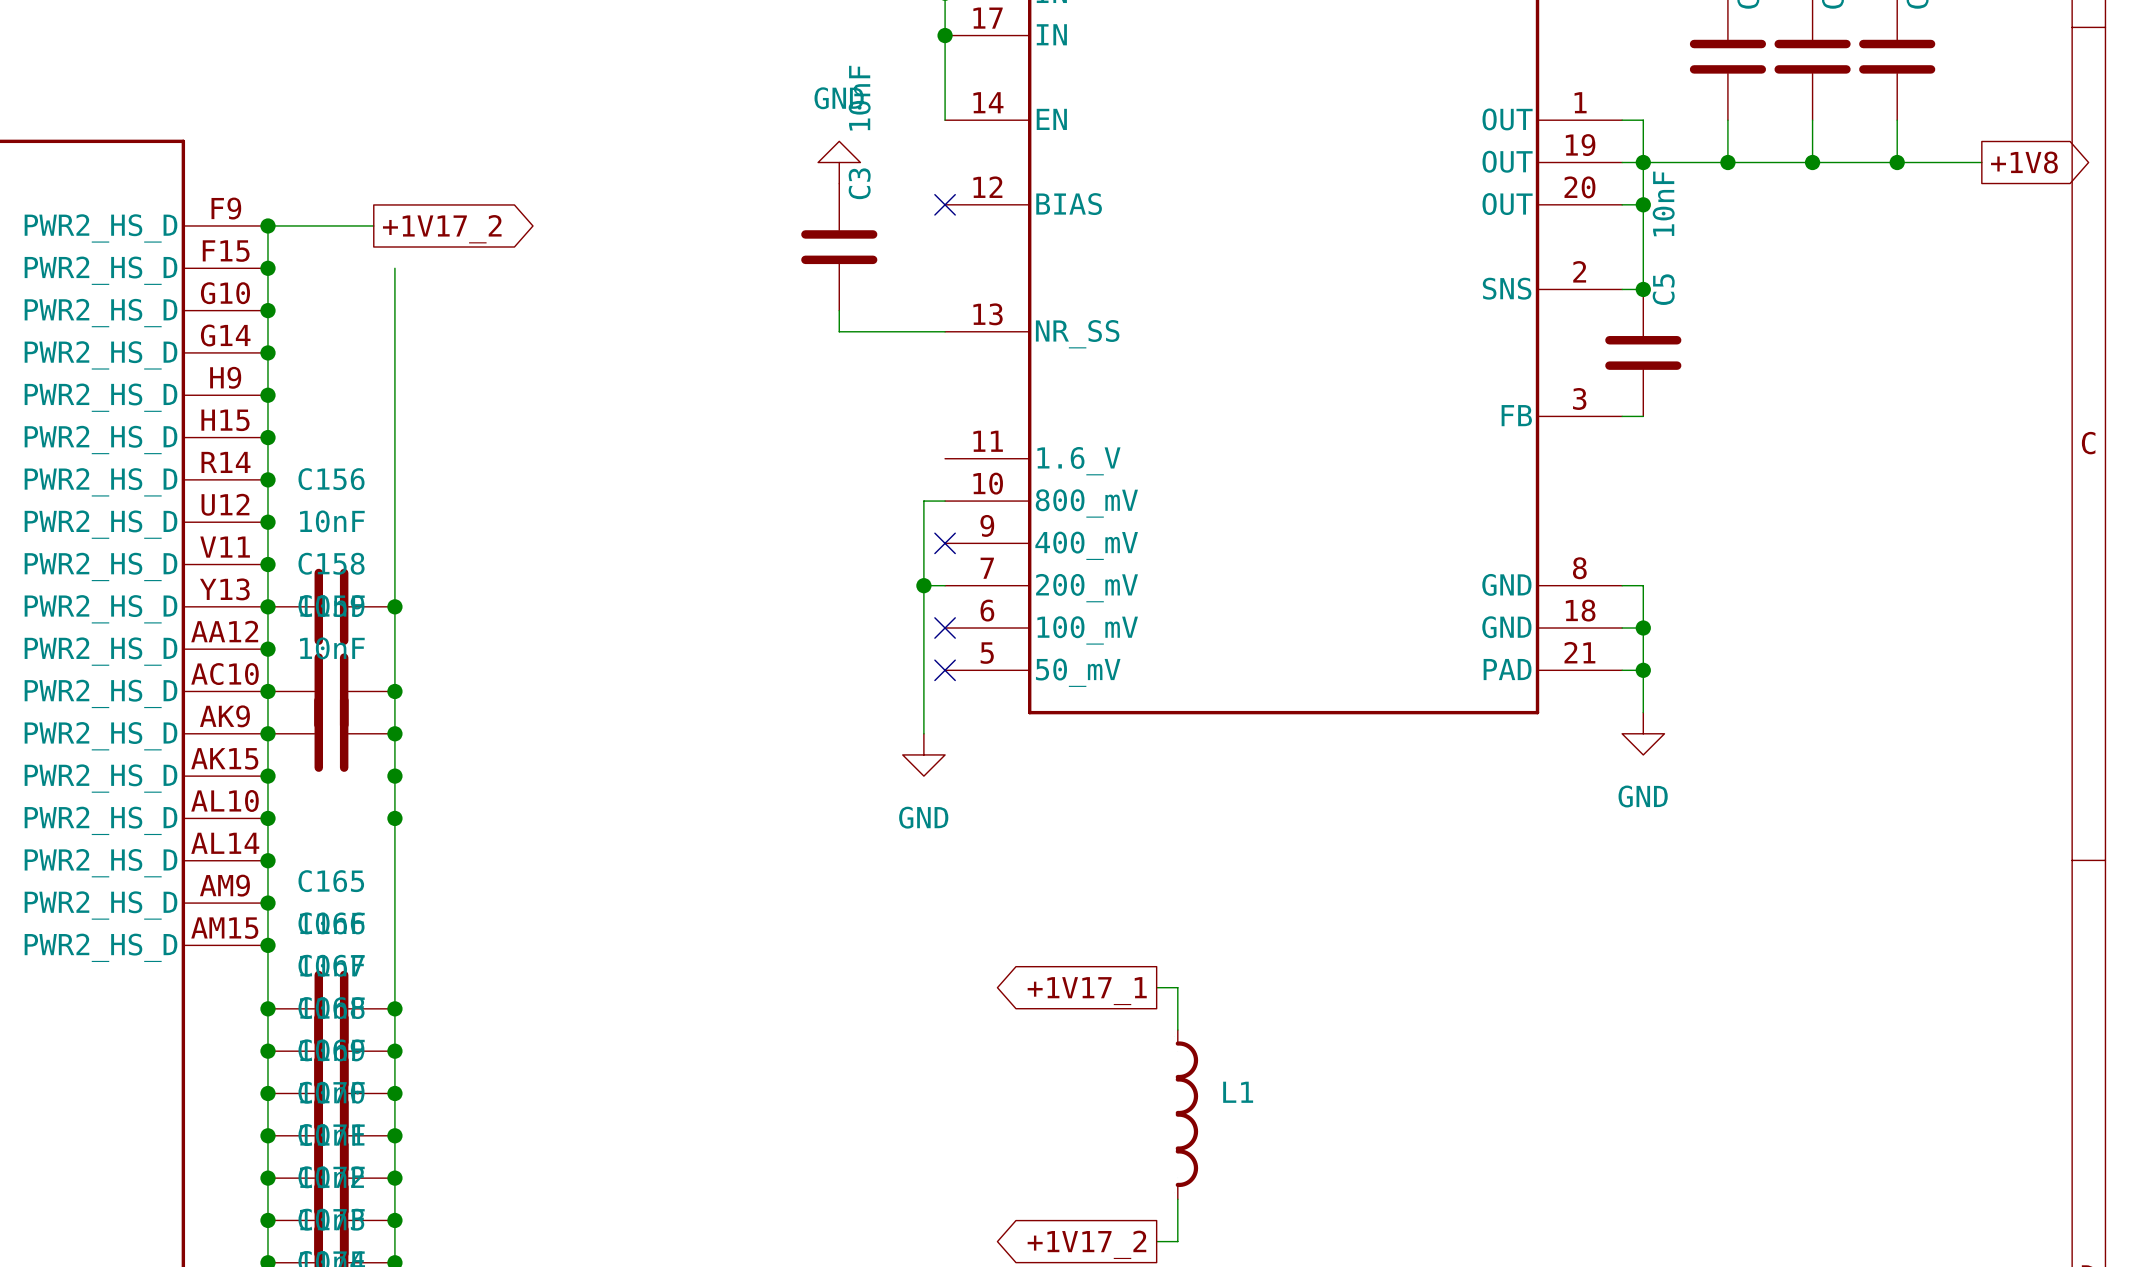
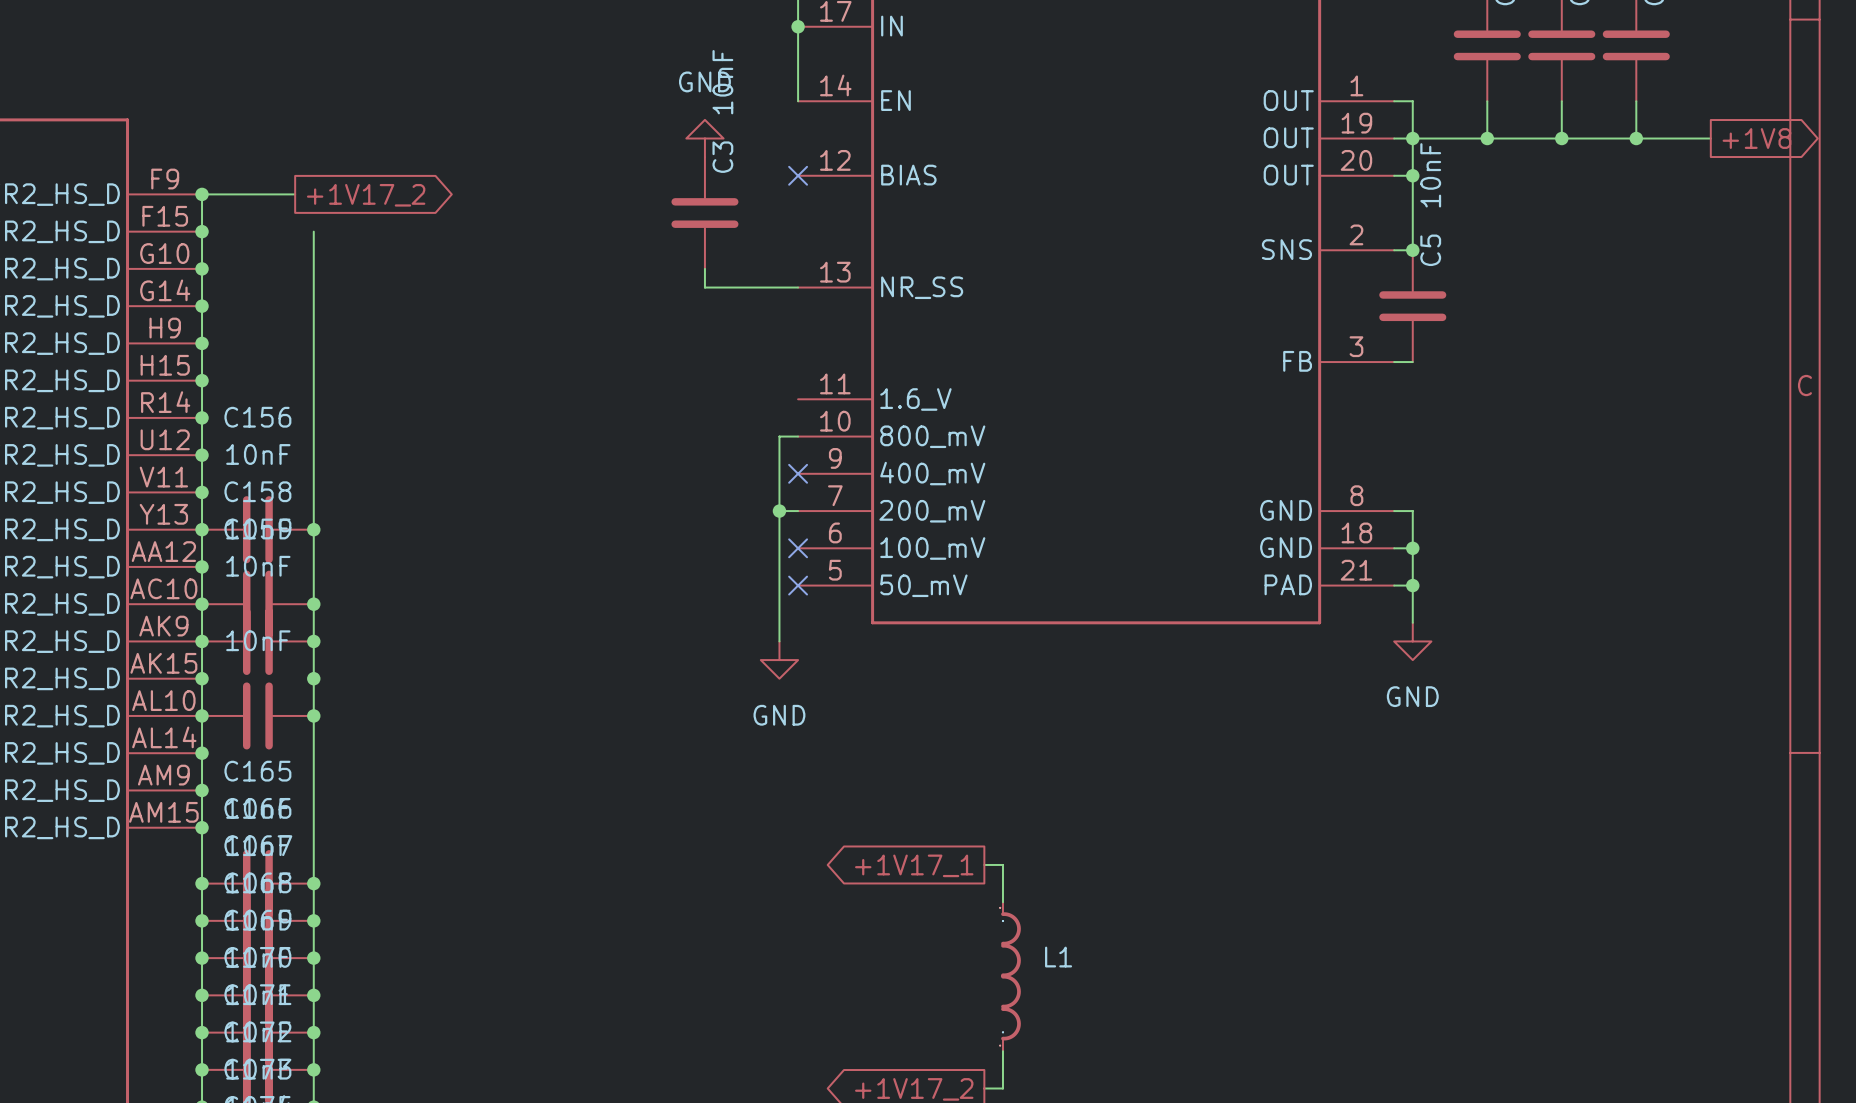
part: none -> 10nF (257, 715)

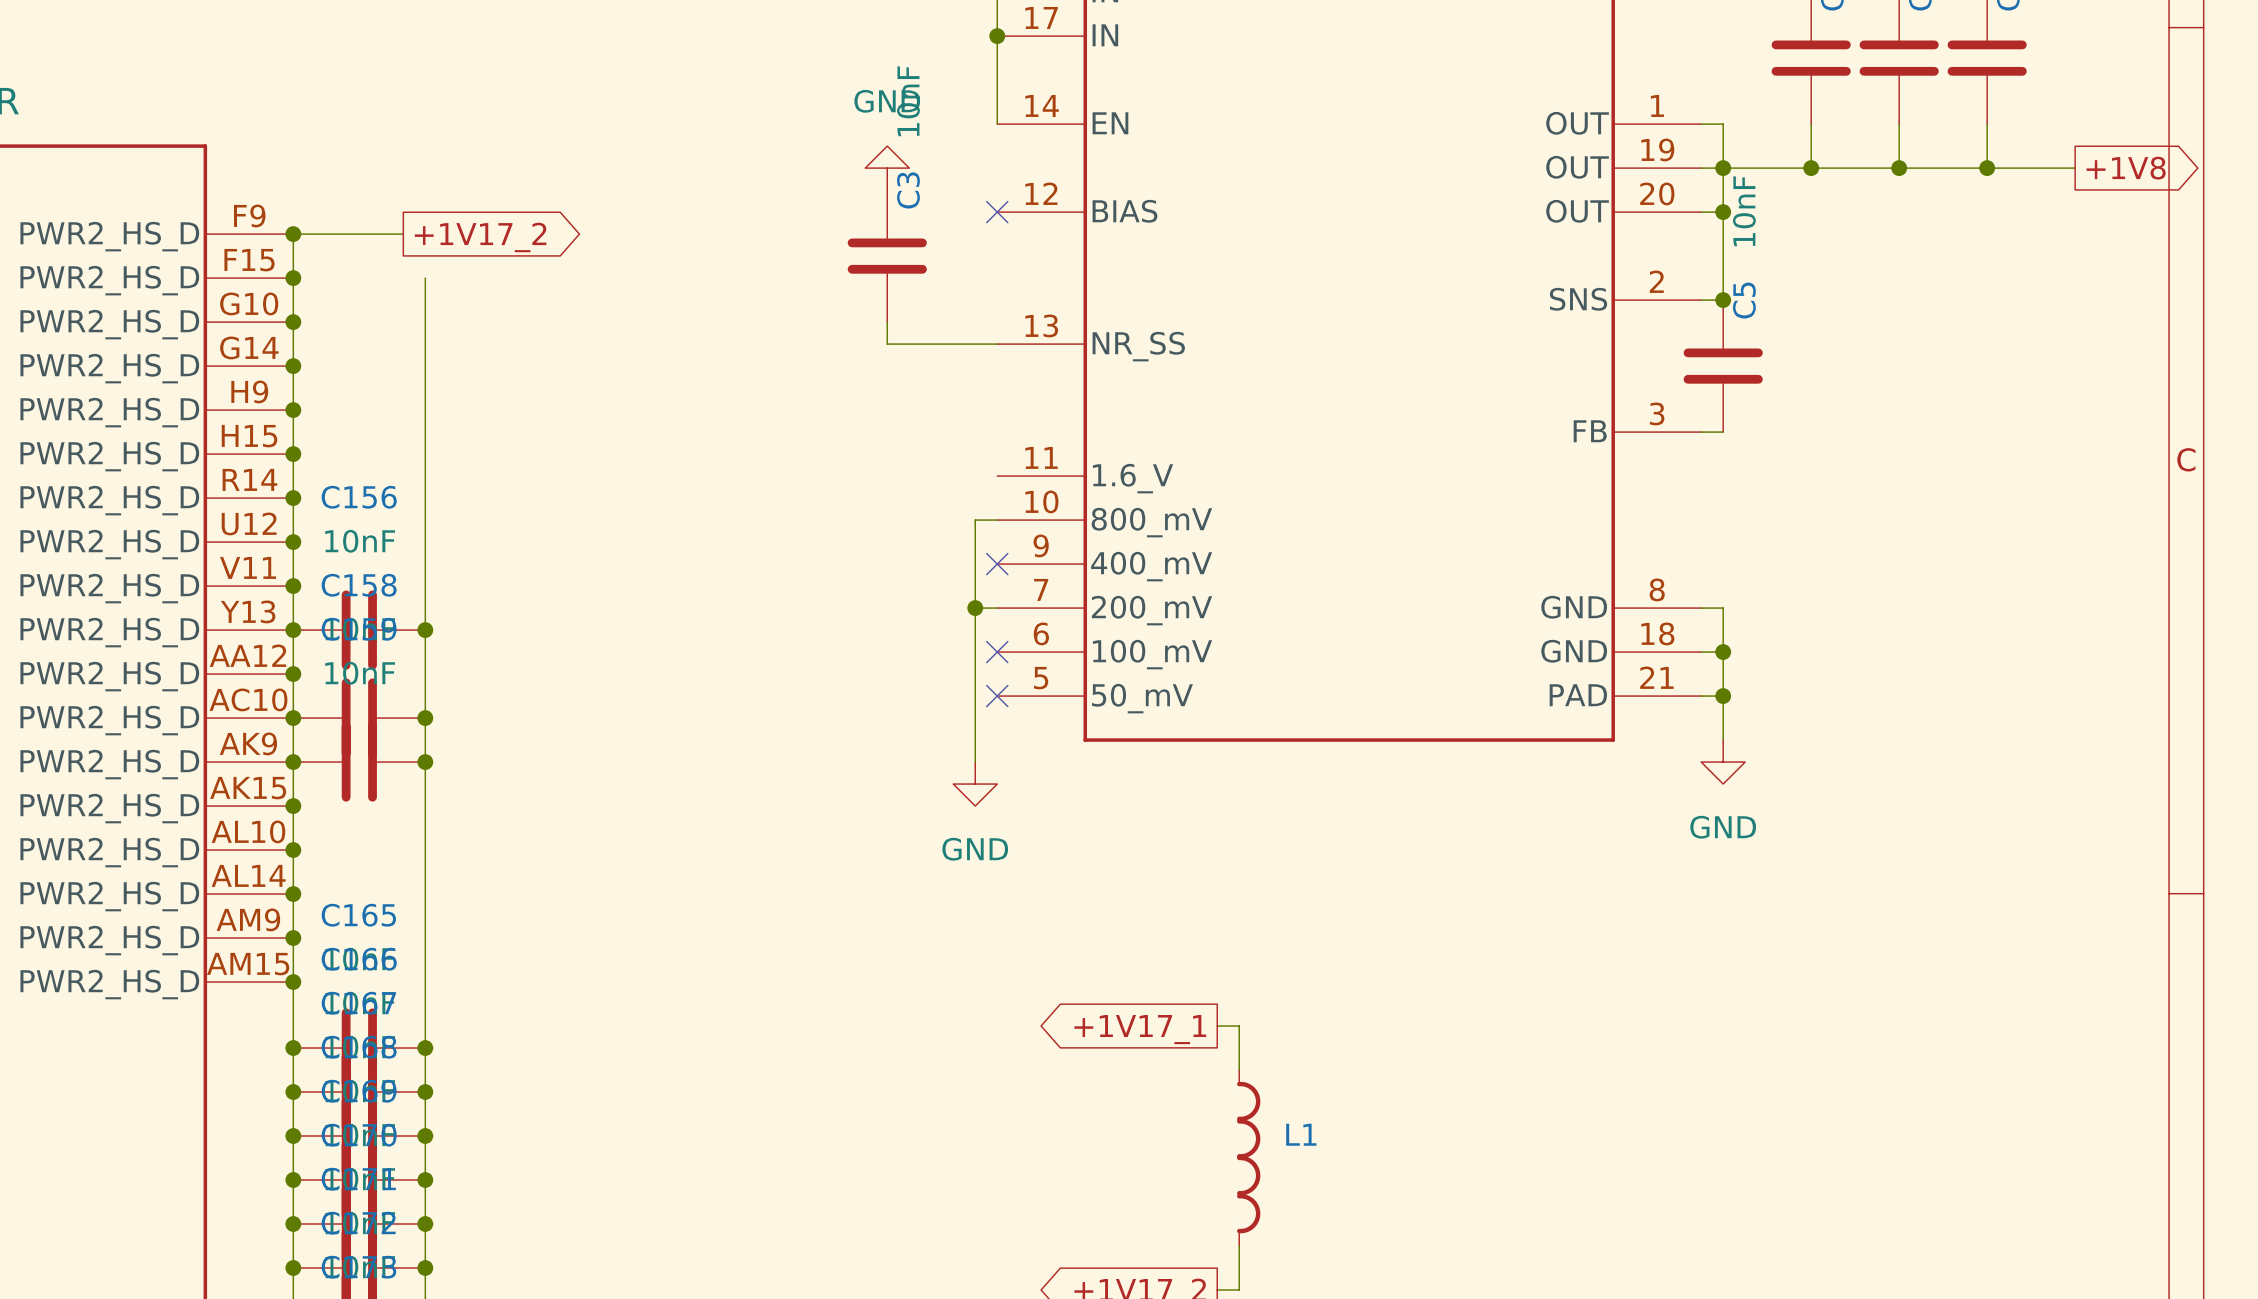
junction: (313, 678) -> none
part: 10nF (257, 715) -> none
junction: (313, 715) -> none

